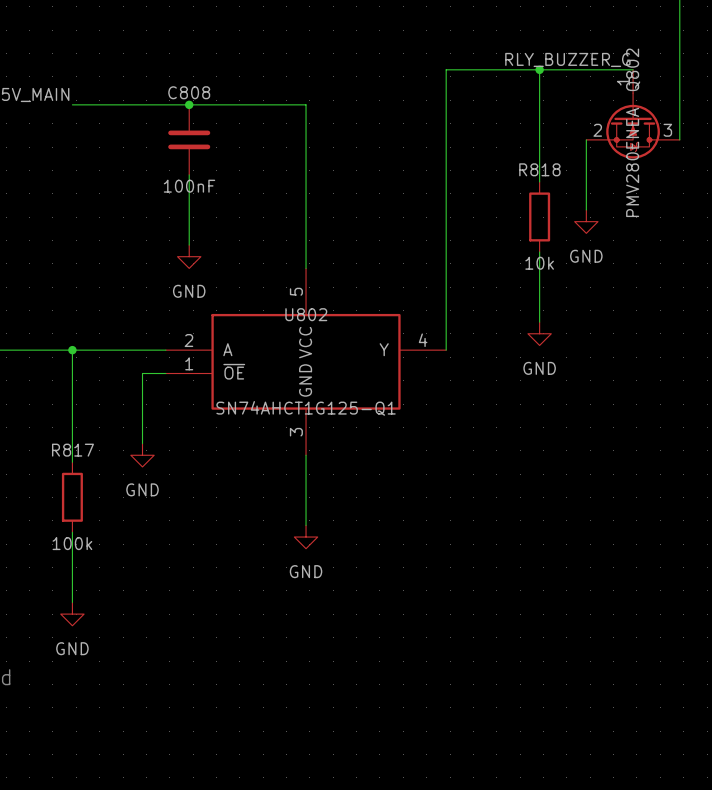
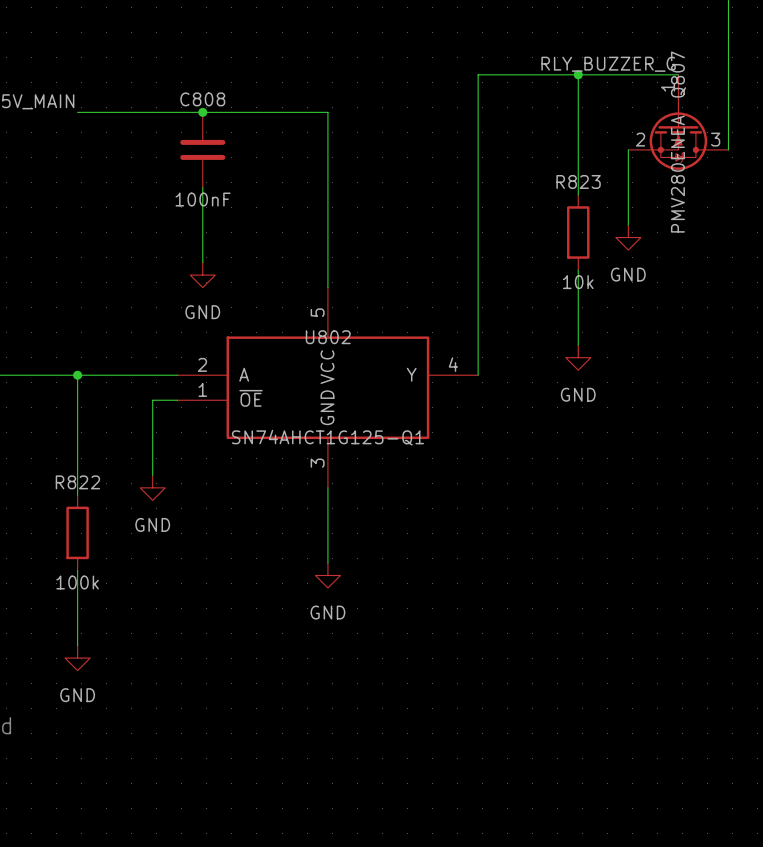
Q802 name: Q802 (633, 69) -> Q807 (678, 74)
R818 name: R818 (539, 169) -> R823 (578, 181)
R817 name: R817 (72, 450) -> R822 (77, 482)

